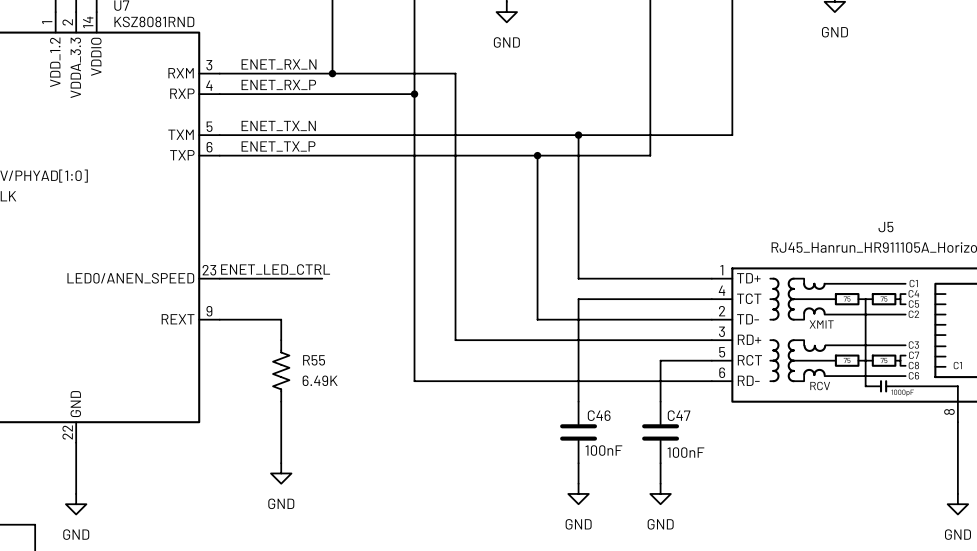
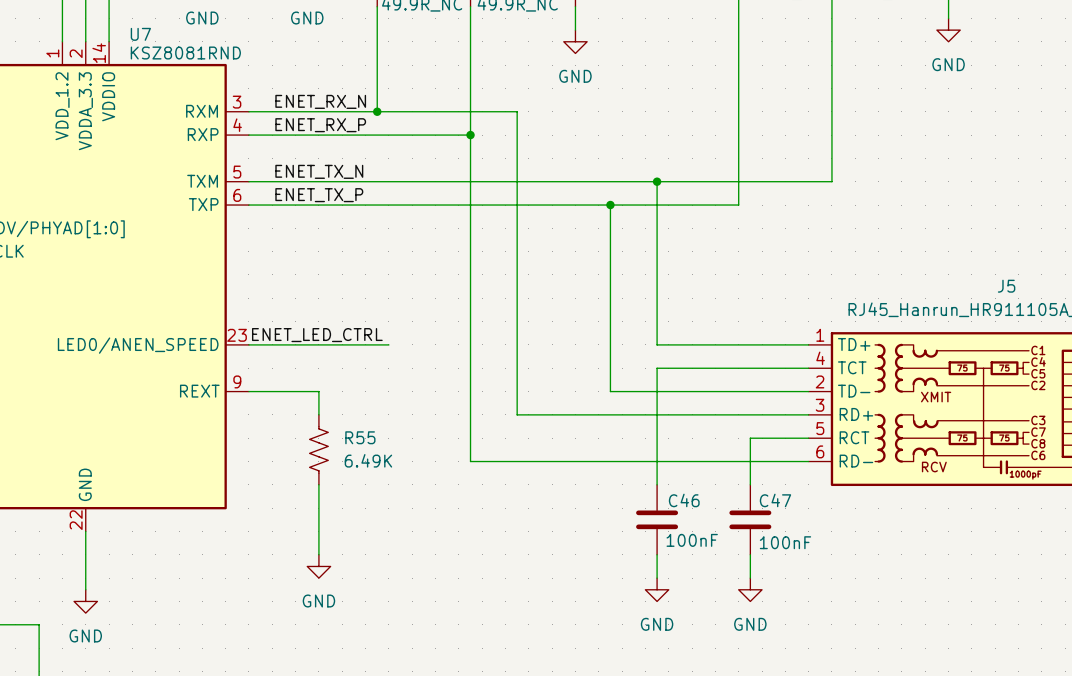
wire: none -> (365, 344) (388, 344)

